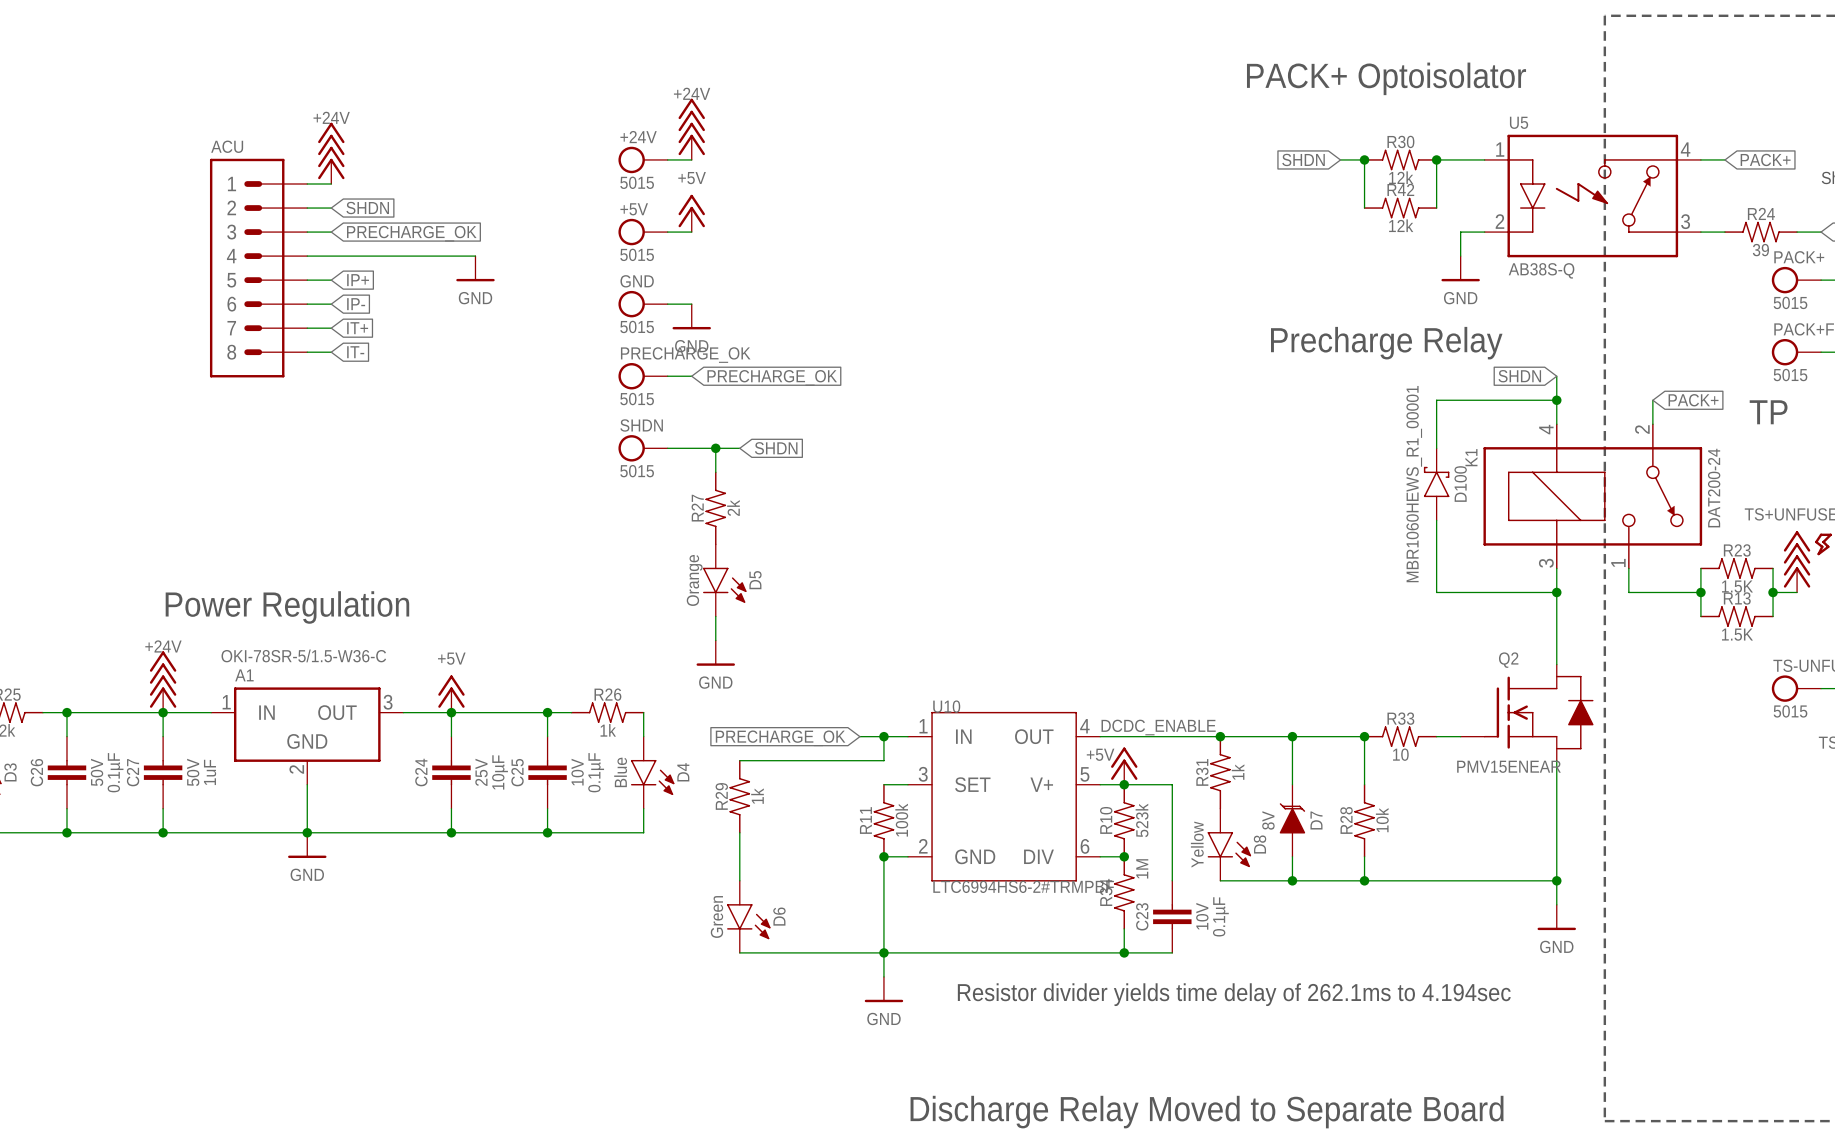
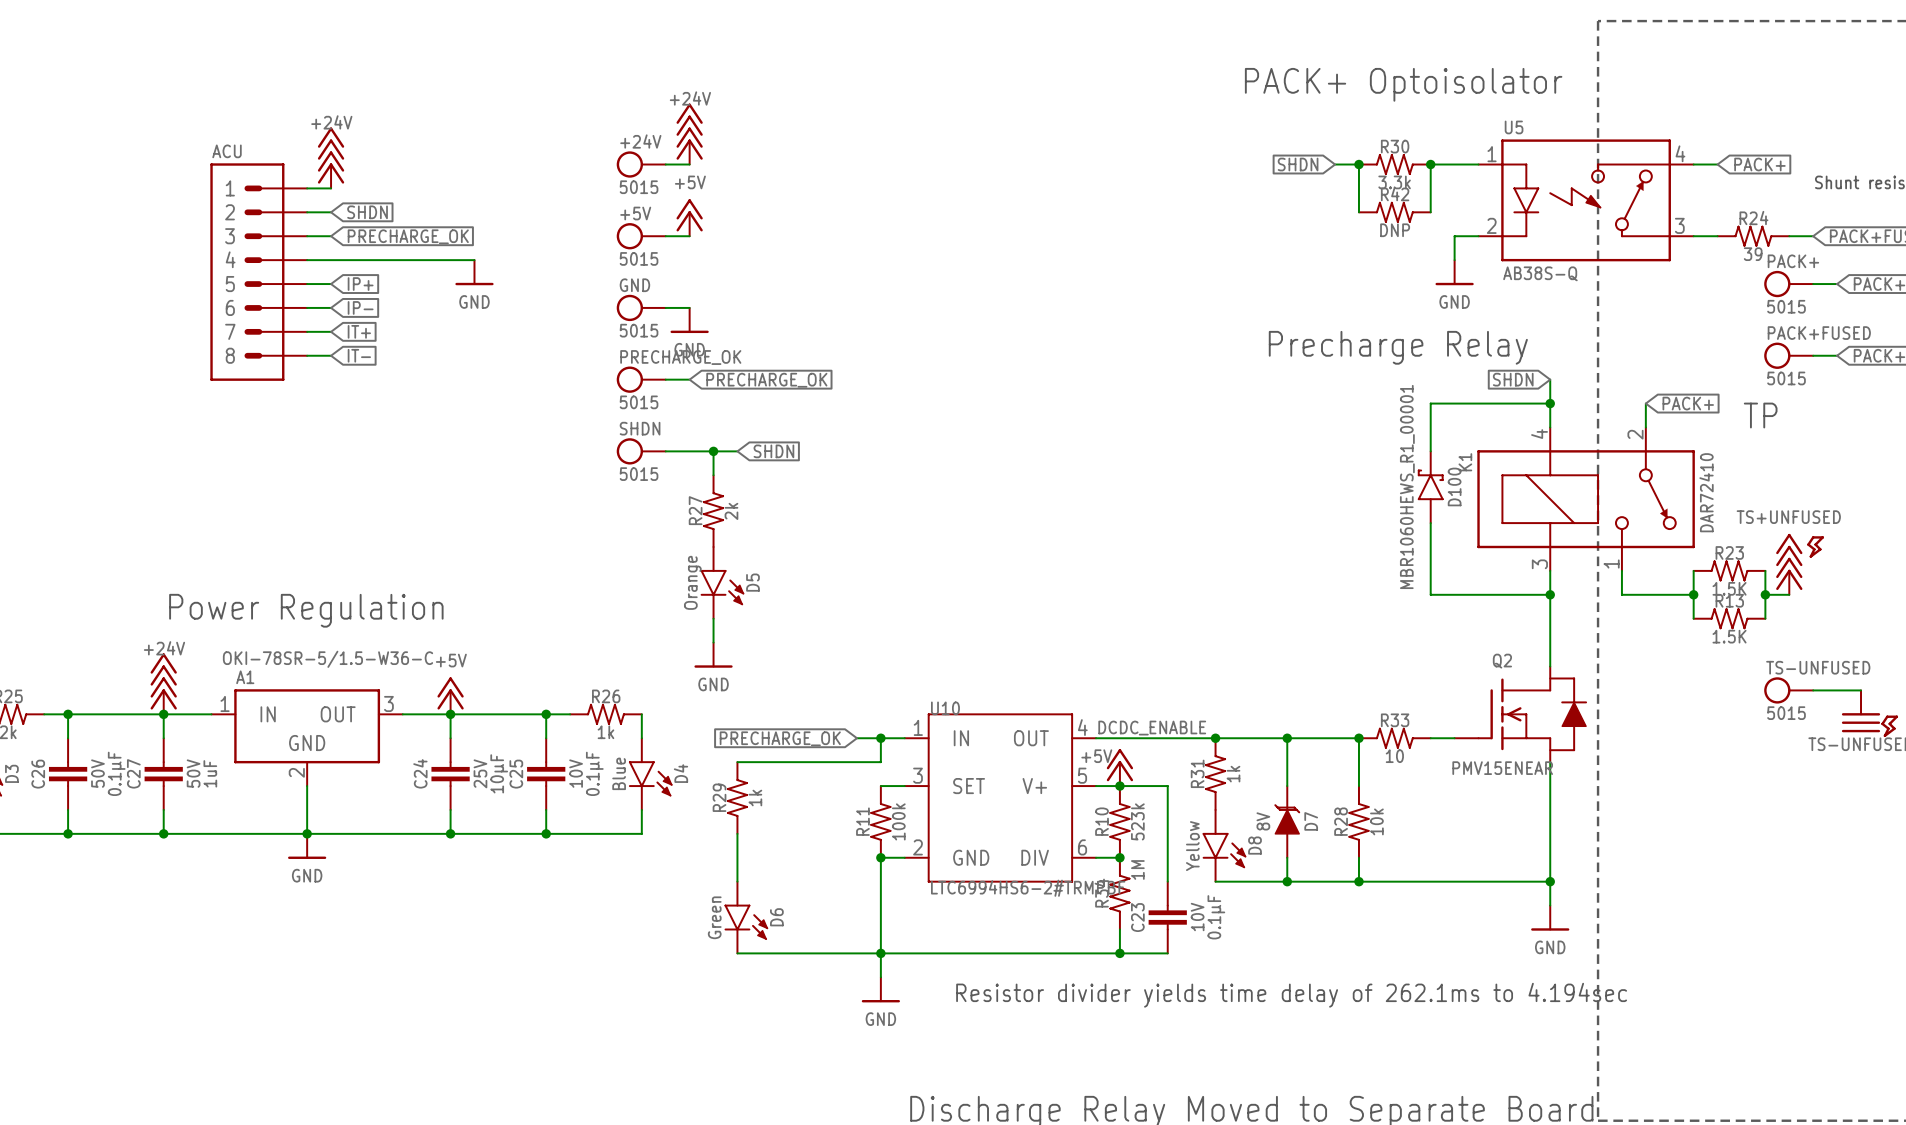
R30 text: 12k (1401, 177) -> 3.3k (1394, 182)
R42 text: 12k (1401, 225) -> DNP (1395, 230)
K1 text: DAT200-24 (1714, 488) -> DAR72410 (1706, 492)

